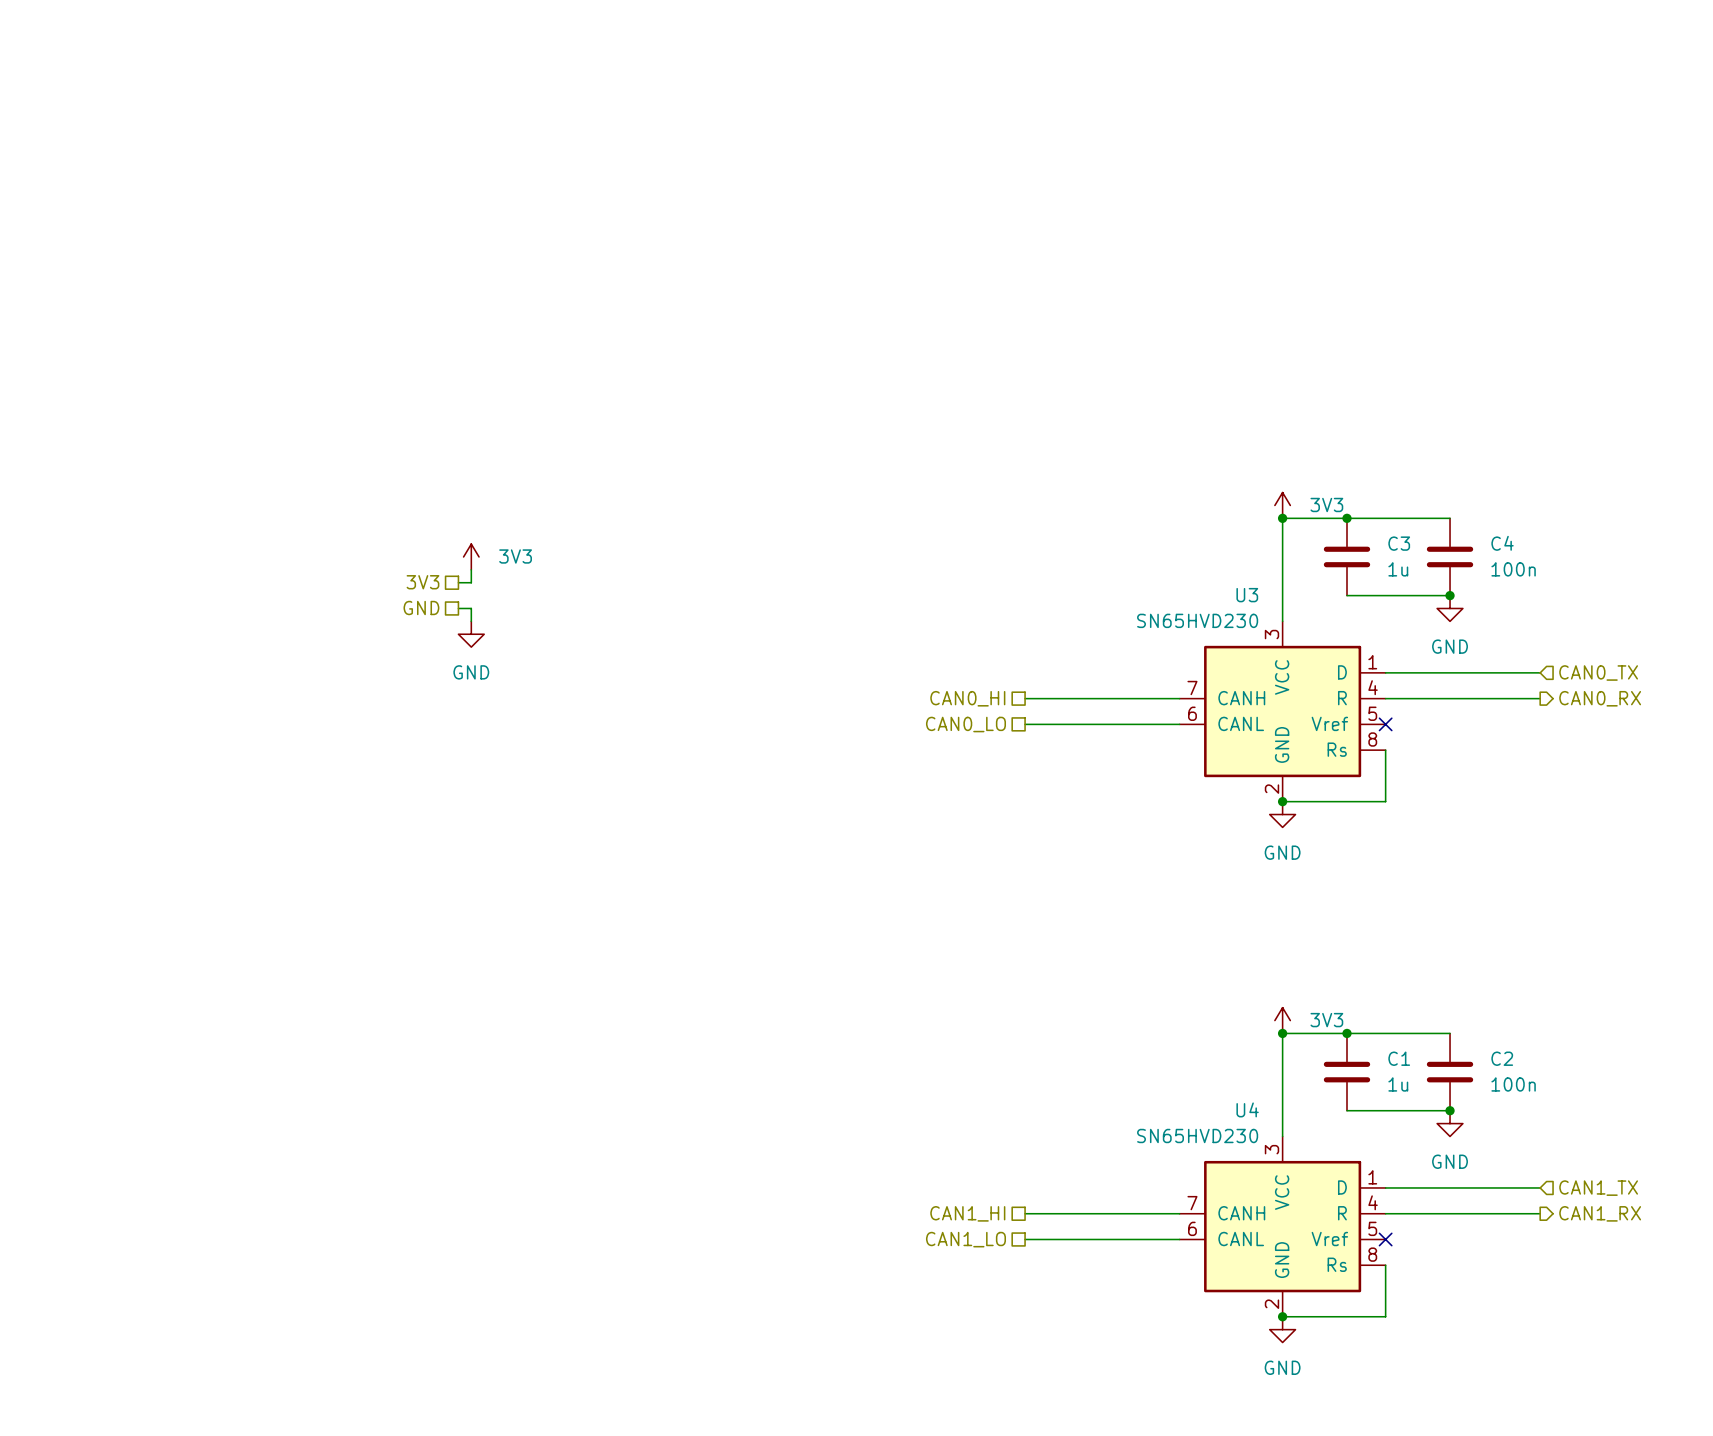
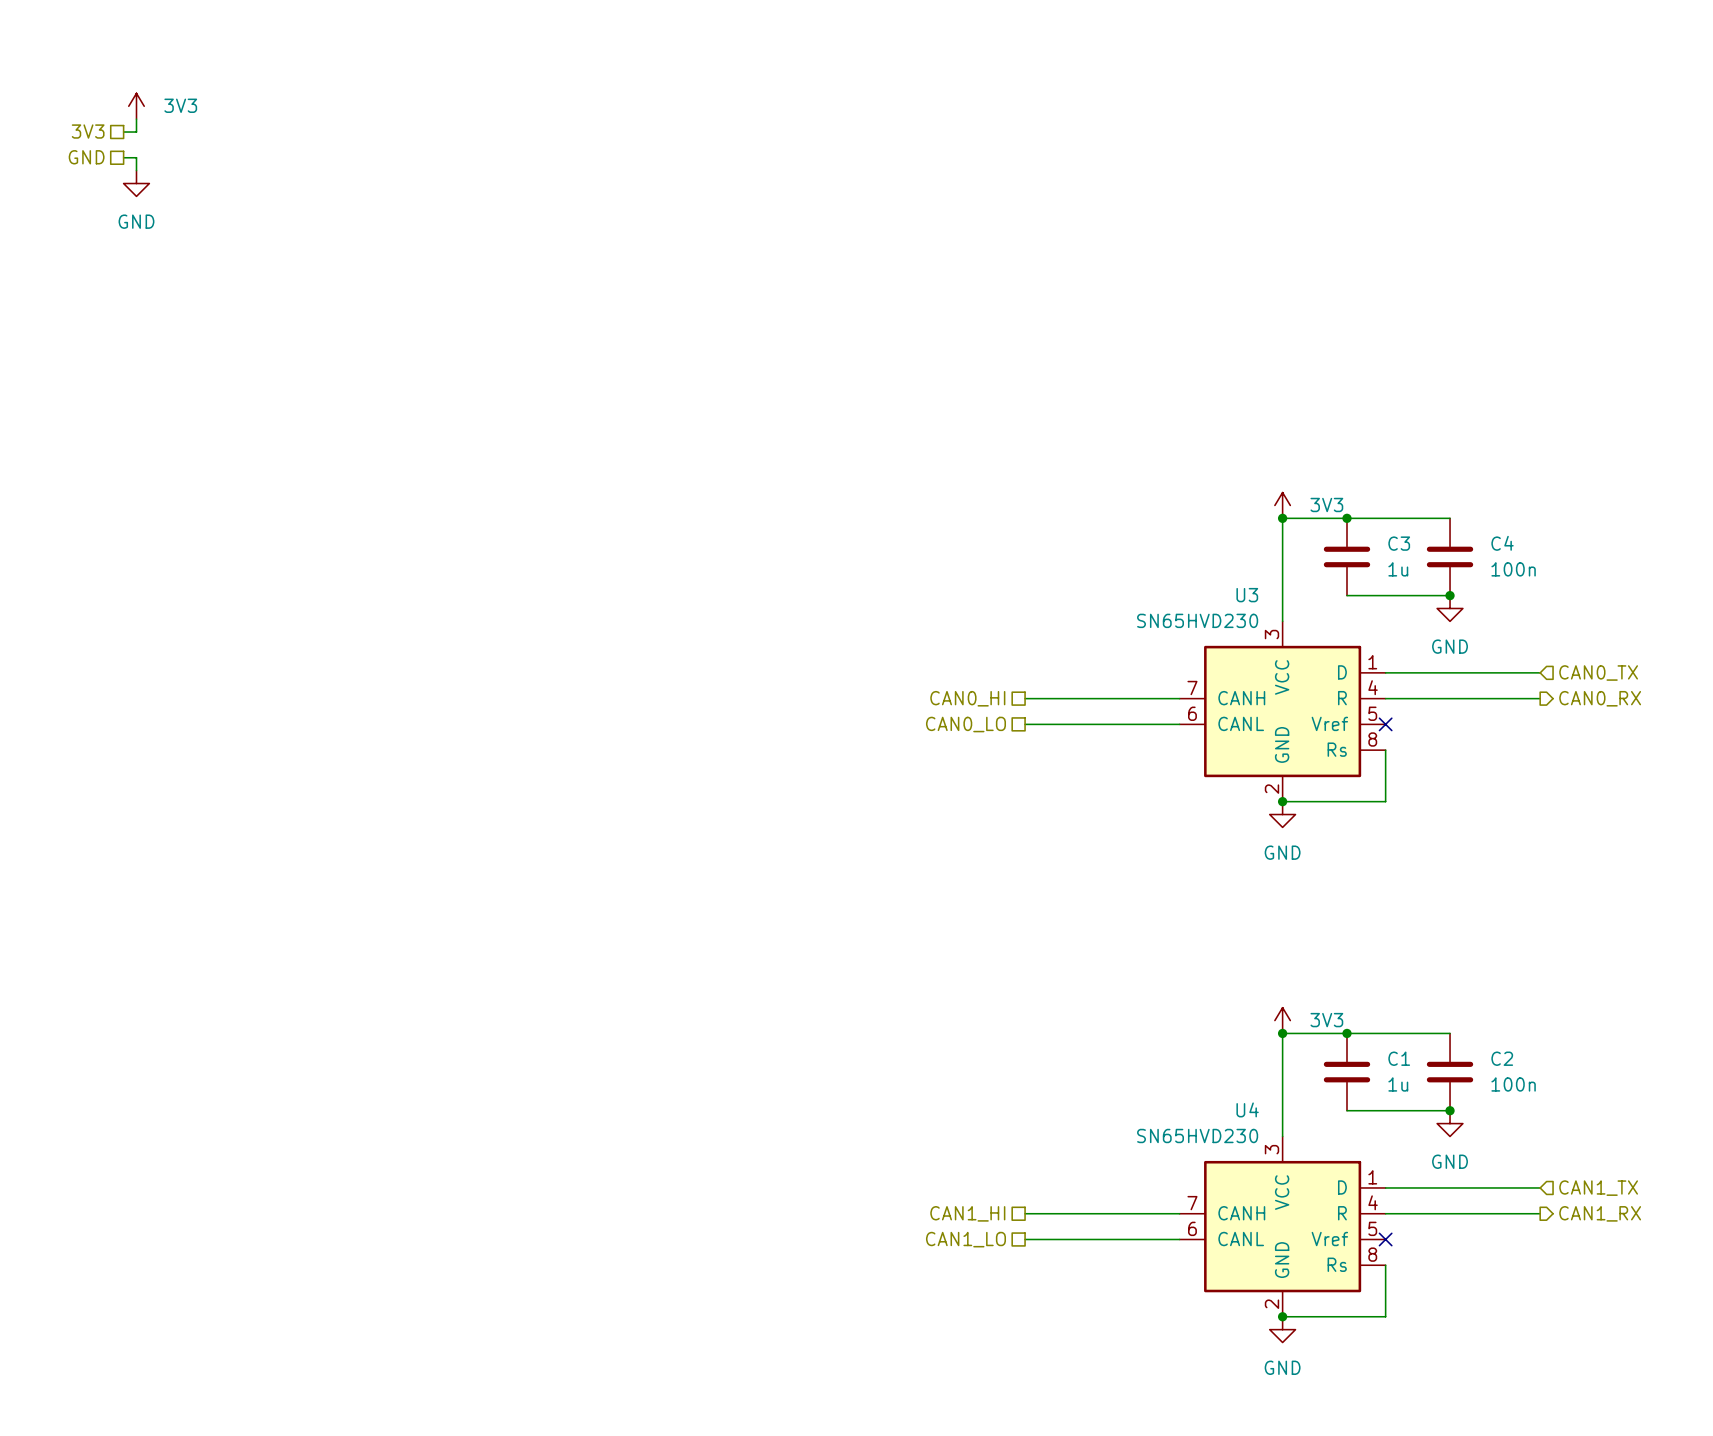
power symbol: none -> 3V3 (136, 106)
wire: none -> (136, 119) (136, 132) (123, 132)
hierarchical label: none -> 3V3 (88, 131)
hierarchical label: none -> GND (86, 157)
wire: none -> (123, 157) (136, 157) (136, 170)
power symbol: none -> GND (136, 183)
power symbol: 3V3 (471, 556) -> none
wire: (471, 569) (471, 582) (458, 582) -> none
hierarchical label: 3V3 (422, 582) -> none
hierarchical label: GND (421, 608) -> none
wire: (458, 608) (471, 608) (471, 621) -> none
power symbol: GND (471, 634) -> none

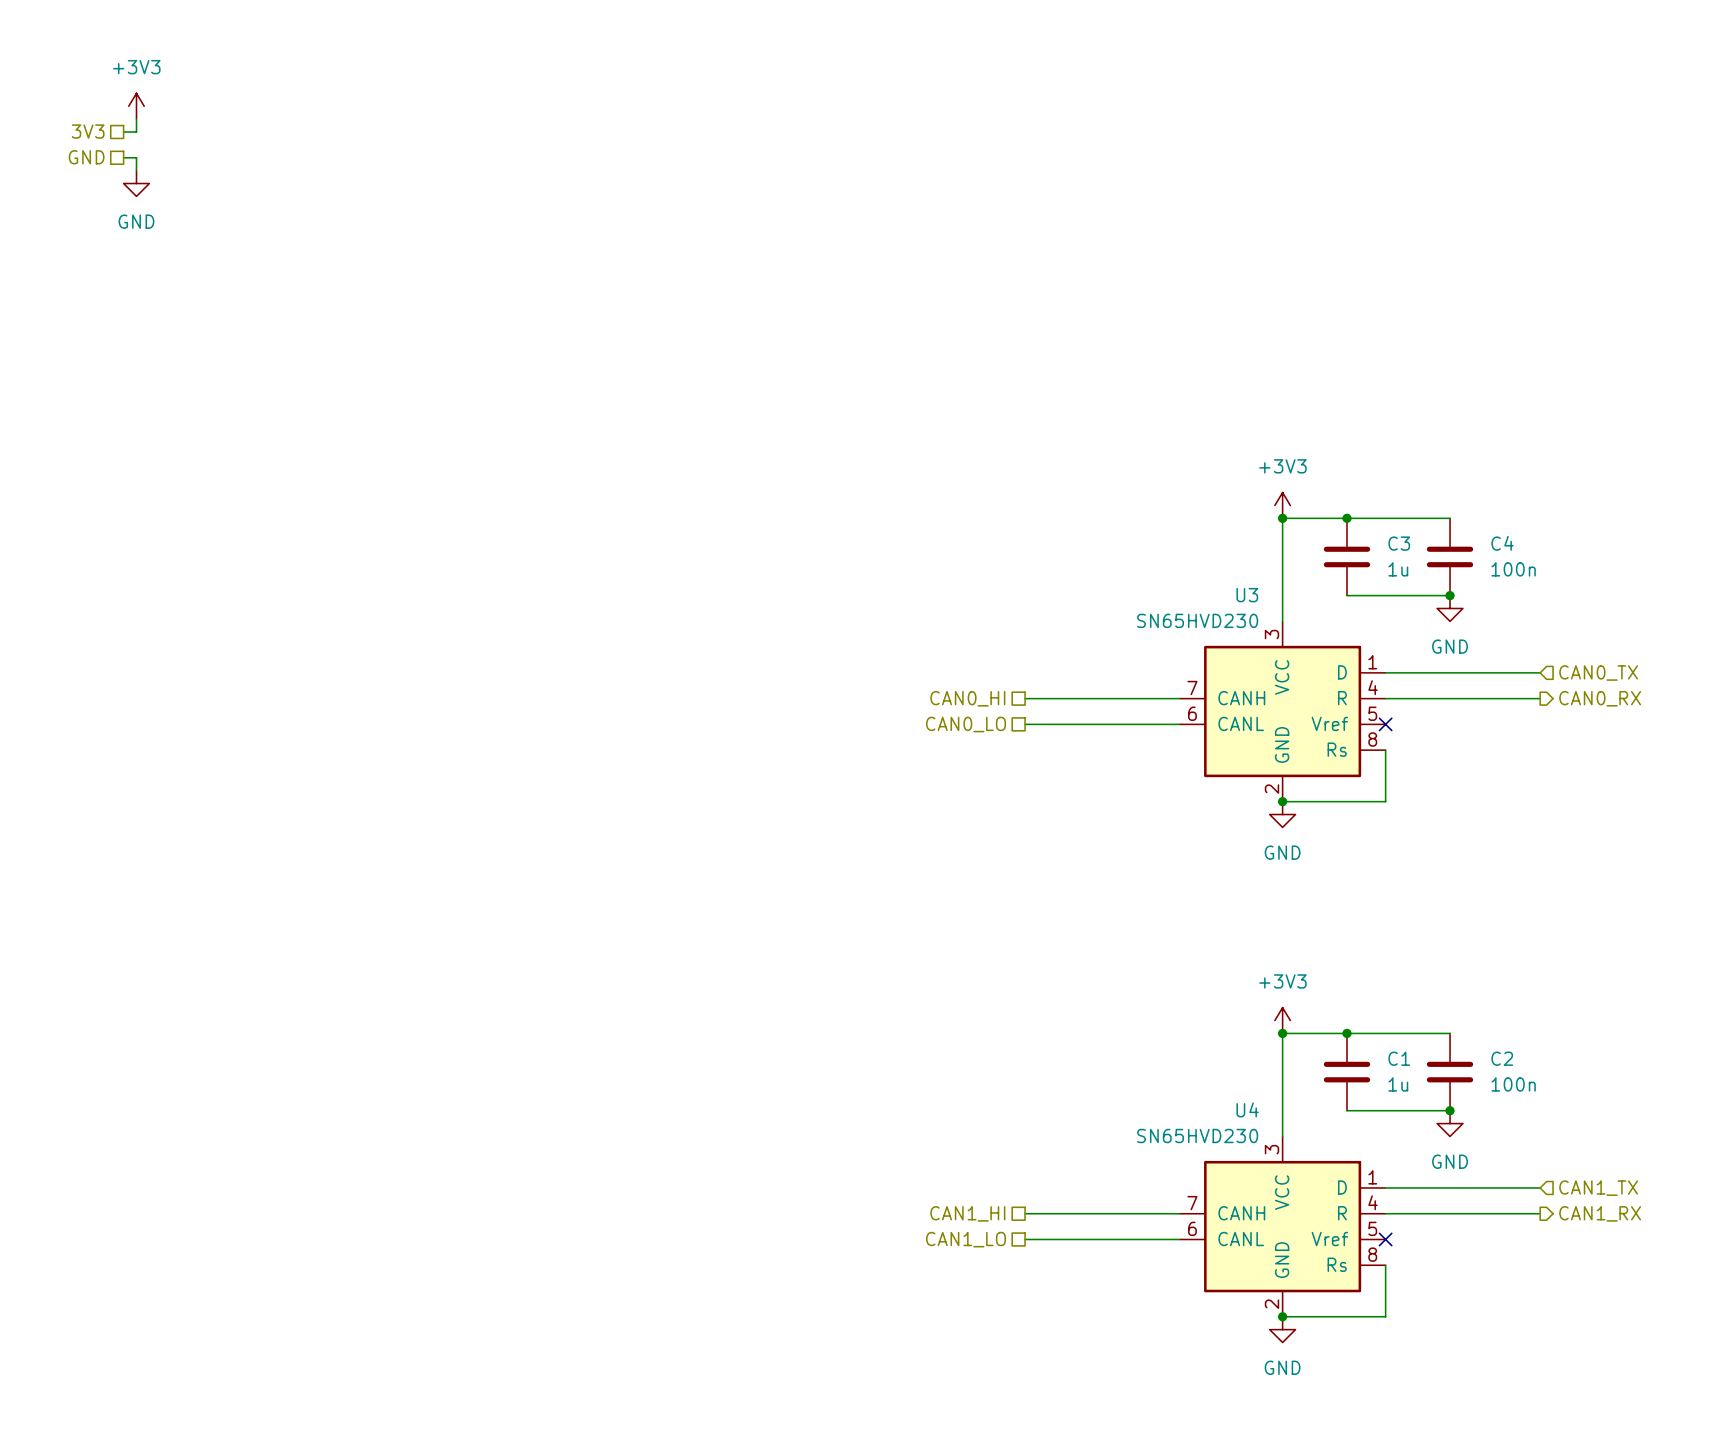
power symbol: 3V3 (136, 106) -> +3V3 (136, 106)
power symbol: 3V3 (1282, 505) -> +3V3 (1282, 505)
power symbol: 3V3 (1282, 1020) -> +3V3 (1282, 1020)

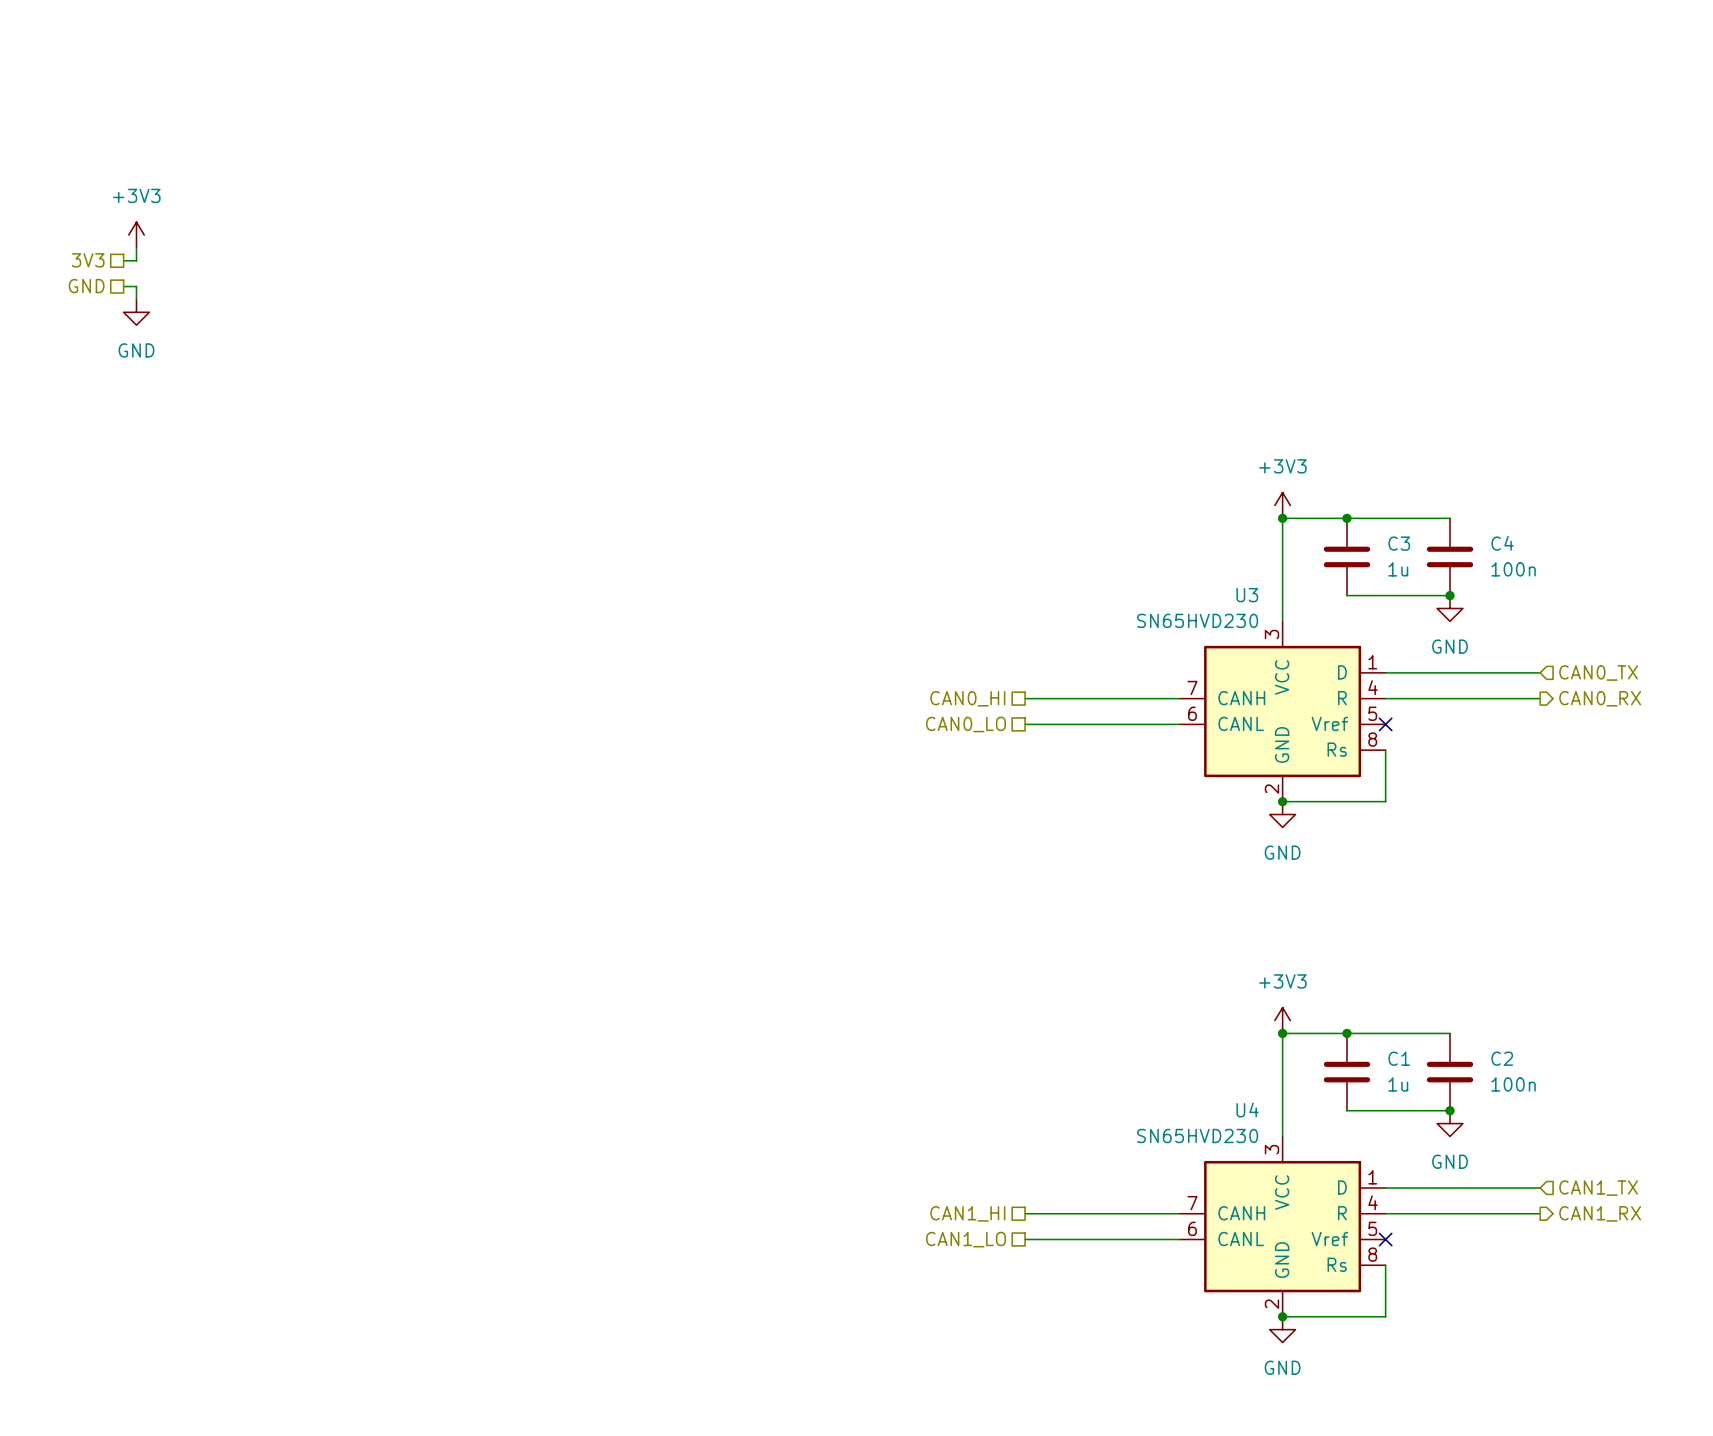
power symbol position: +3V3 (136, 106) -> +3V3 (136, 235)
wire: (136, 119) (136, 132) (123, 132) -> (136, 247) (136, 260) (123, 260)
hierarchical label position: 3V3 (88, 131) -> 3V3 (88, 260)
hierarchical label position: GND (86, 157) -> GND (86, 286)
wire: (123, 157) (136, 157) (136, 170) -> (123, 286) (136, 286) (136, 299)
power symbol position: GND (136, 183) -> GND (136, 312)

